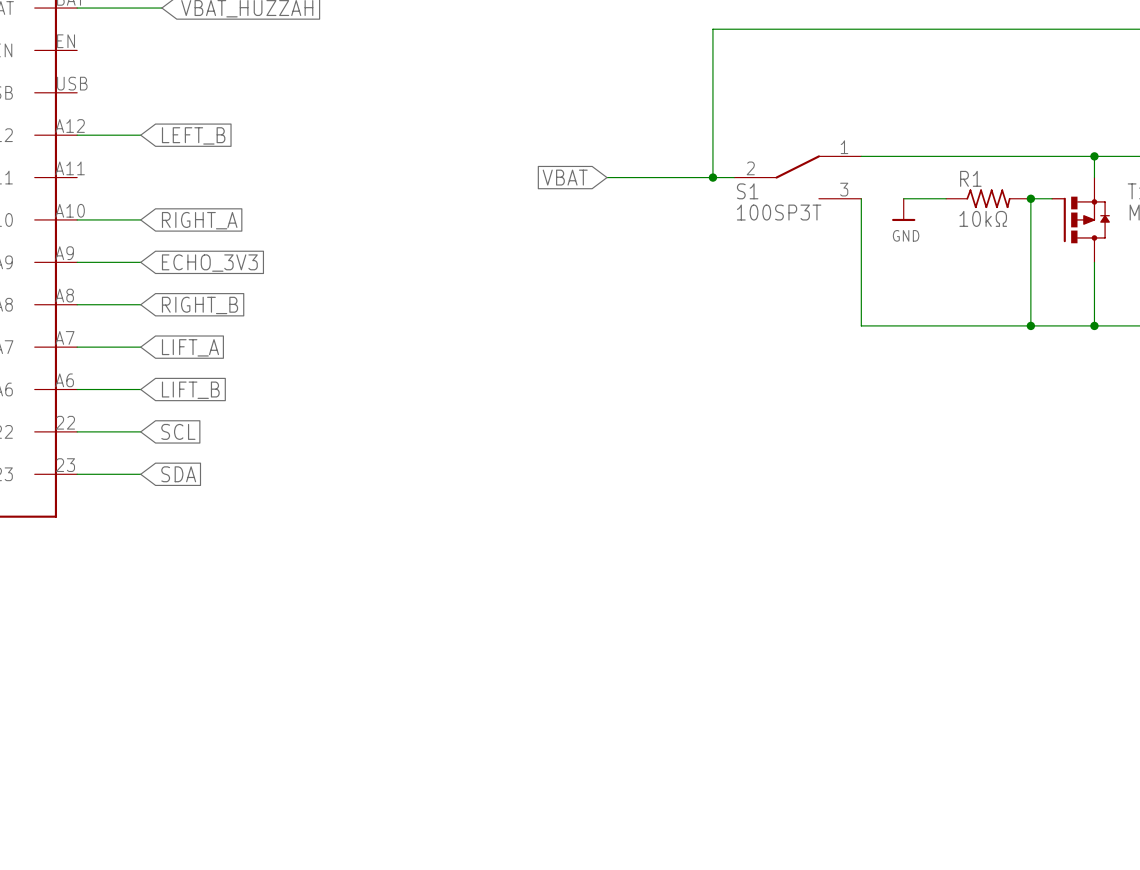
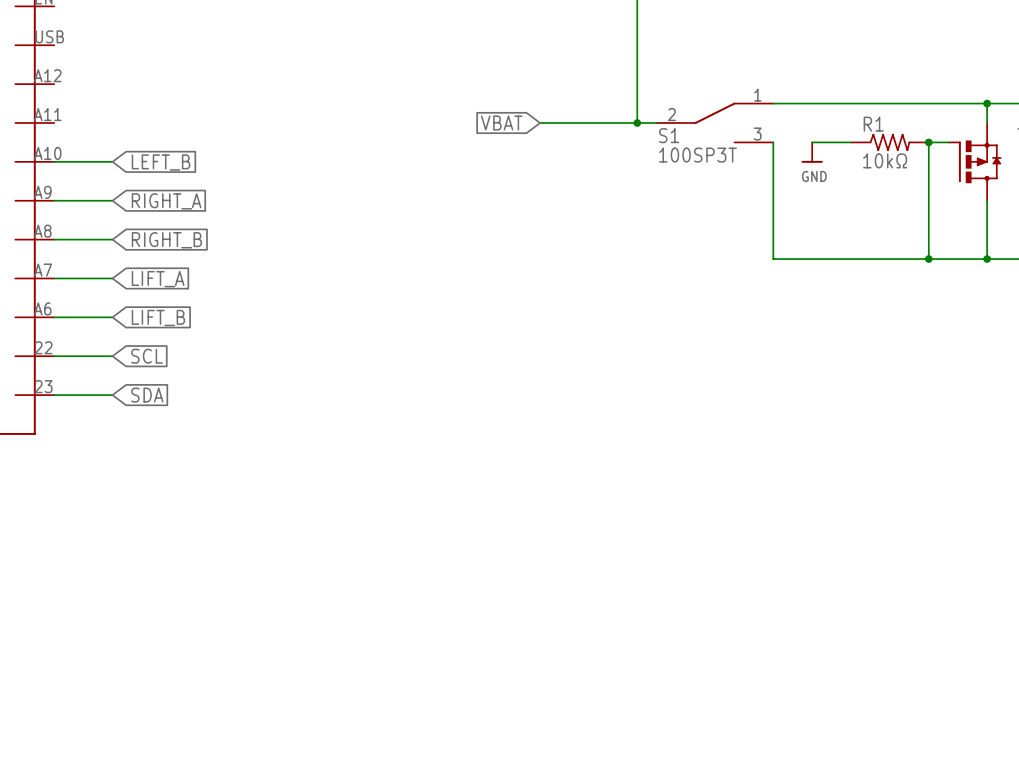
wire: (77, 135) (140, 135) -> none
global label: LEFT_B (193, 135) -> none
global label: RIGHT_A (199, 220) -> LEFT_B (161, 162)
global label: ECHO_3V3 (209, 263) -> RIGHT_A (166, 201)

